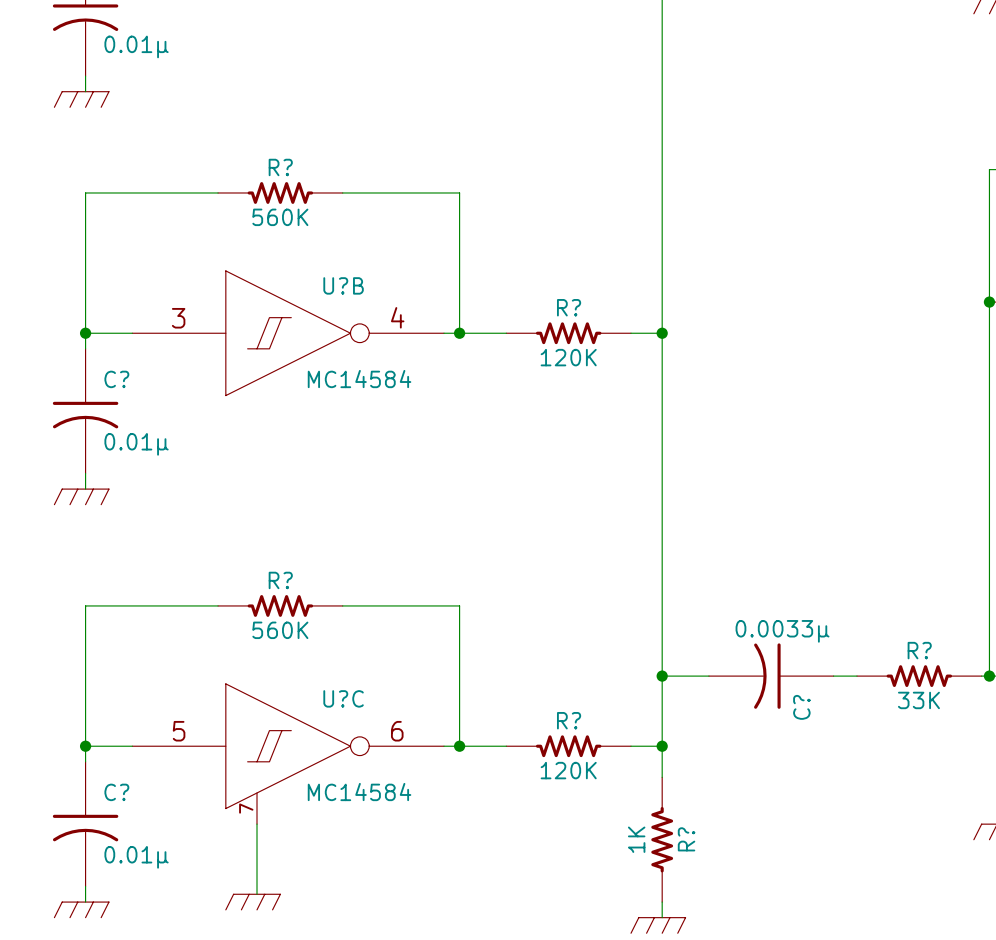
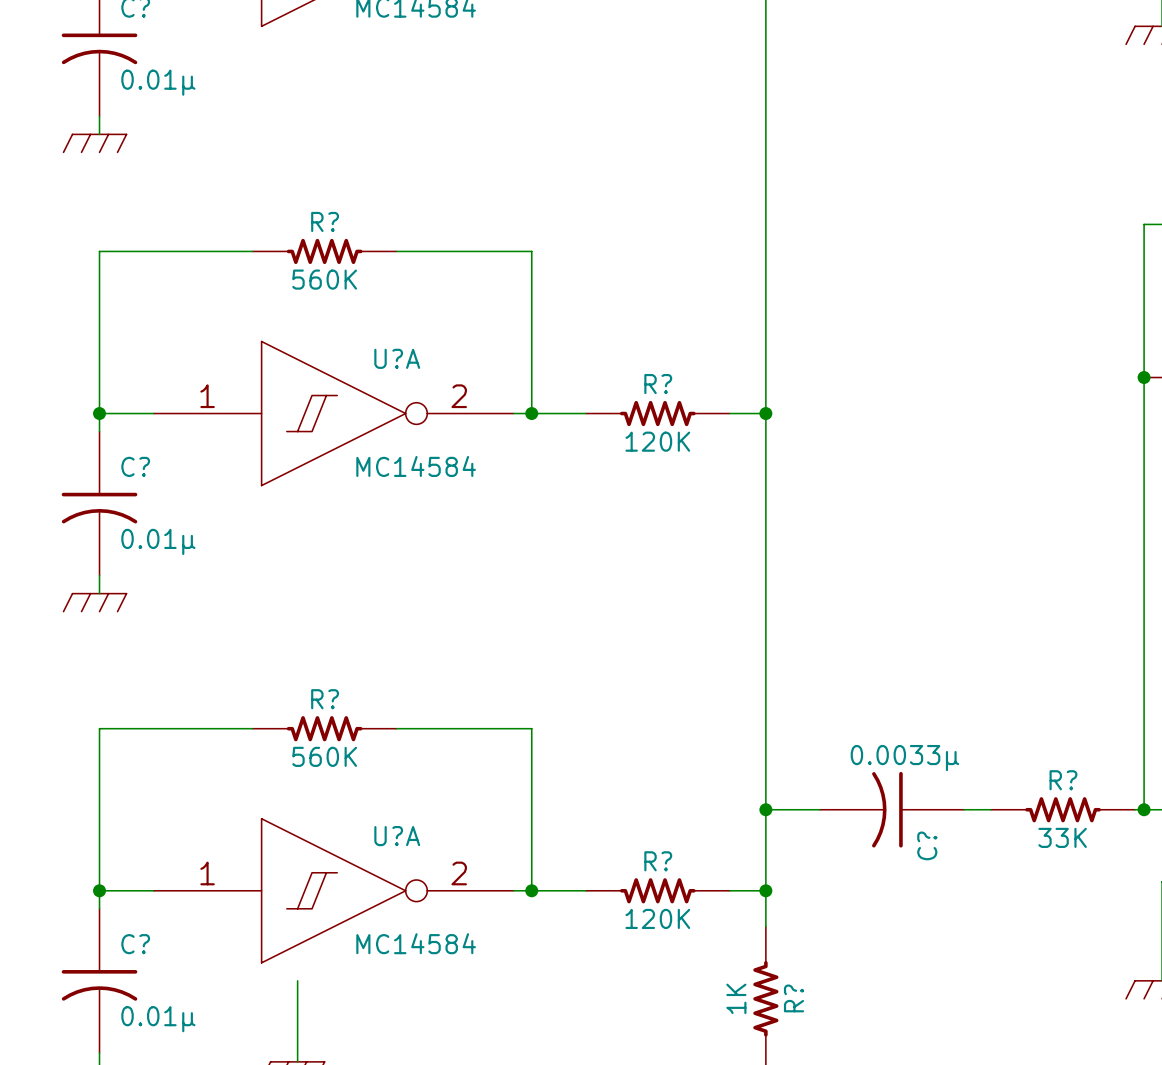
U?B name: U?B (343, 285) -> U?A (397, 358)
U?B pin number: 4 (397, 317) -> 2 (459, 396)
U?B pin number: 3 (178, 318) -> 1 (207, 396)
U?A: none -> MC14584 (333, 890)
U?C: MC14584 (288, 754) -> none

